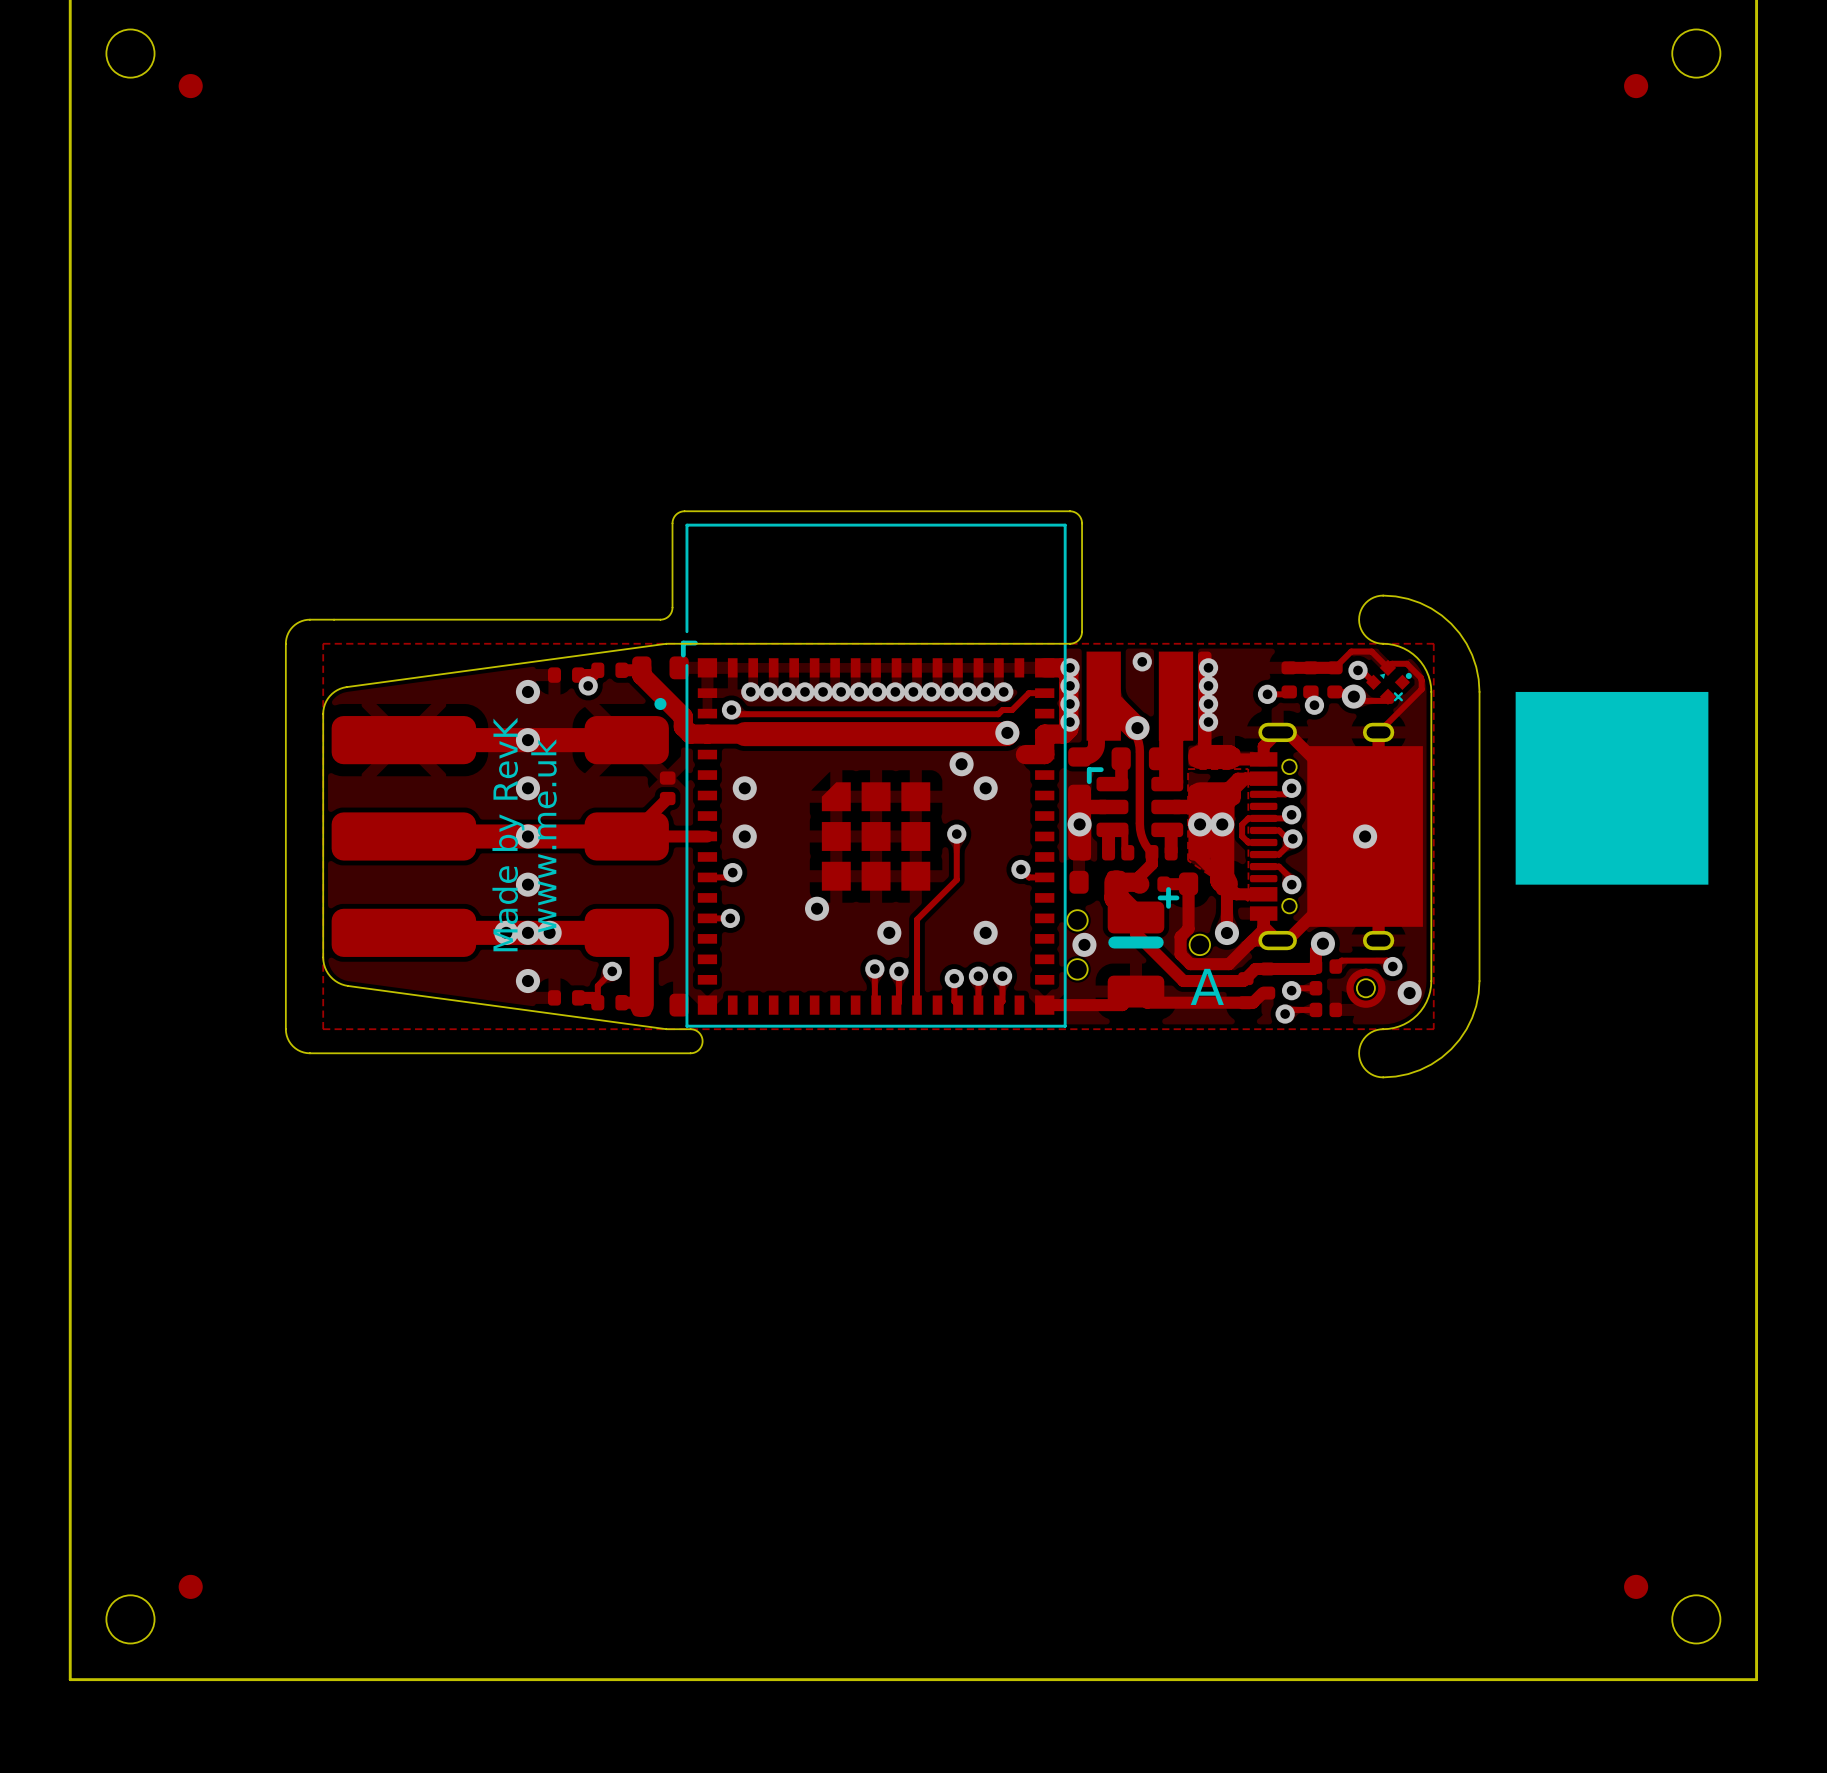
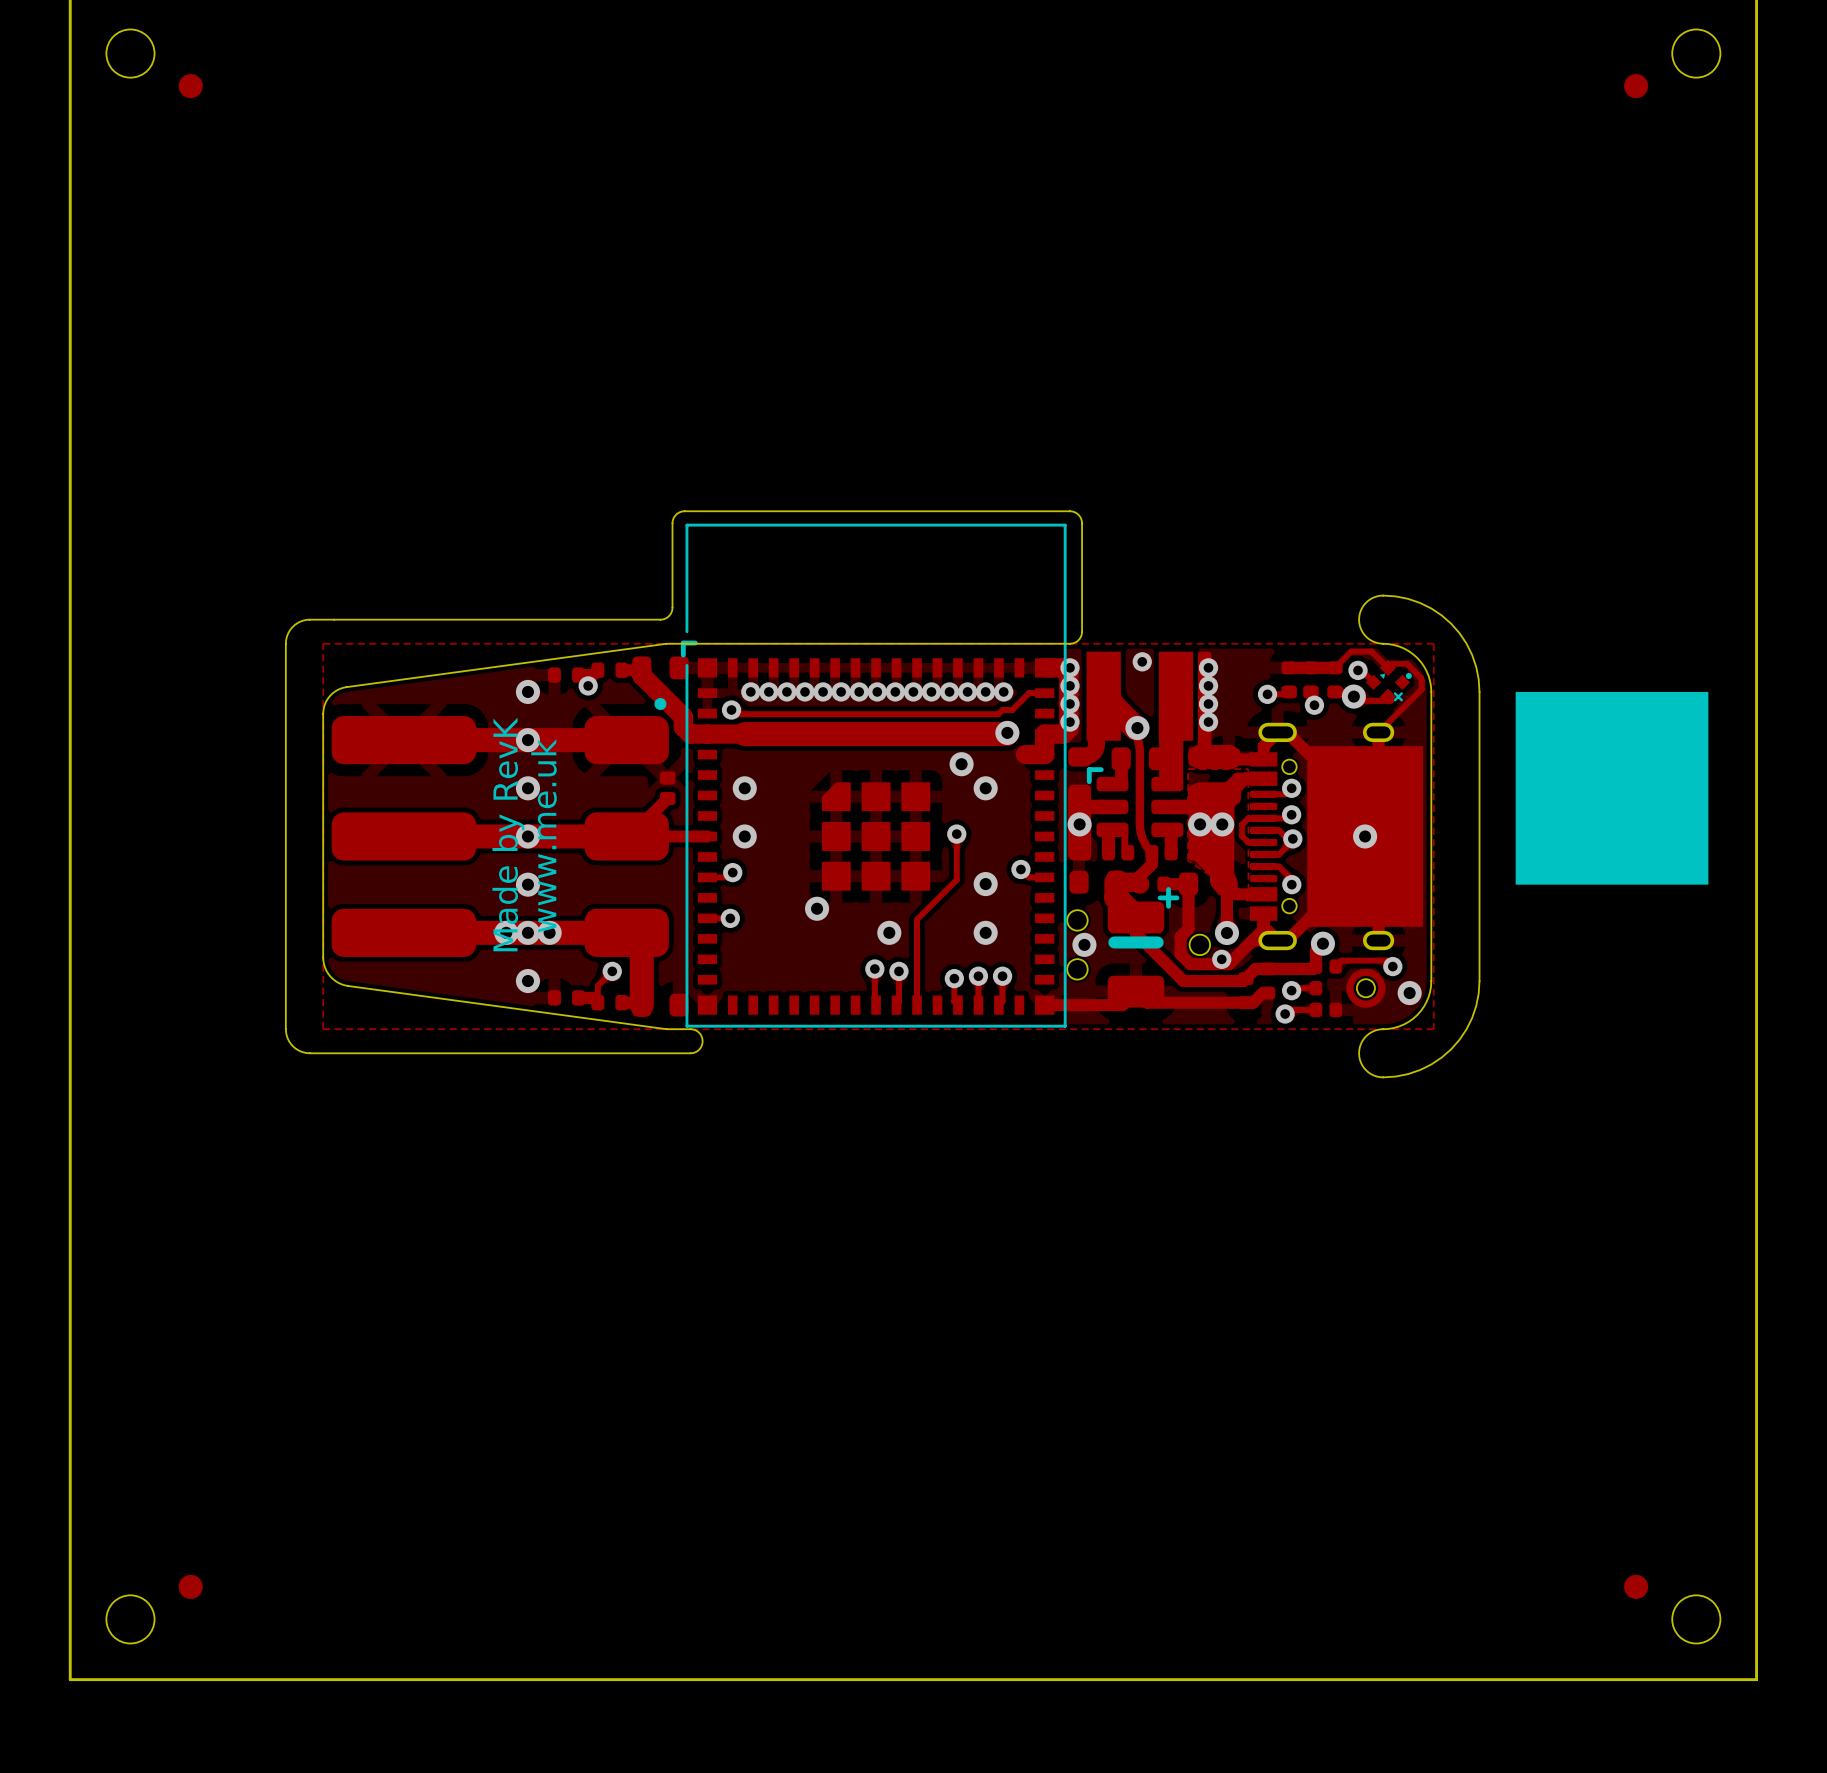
via: none -> (985, 884)
via: none -> (1221, 959)
text: A (1207, 986) -> none

